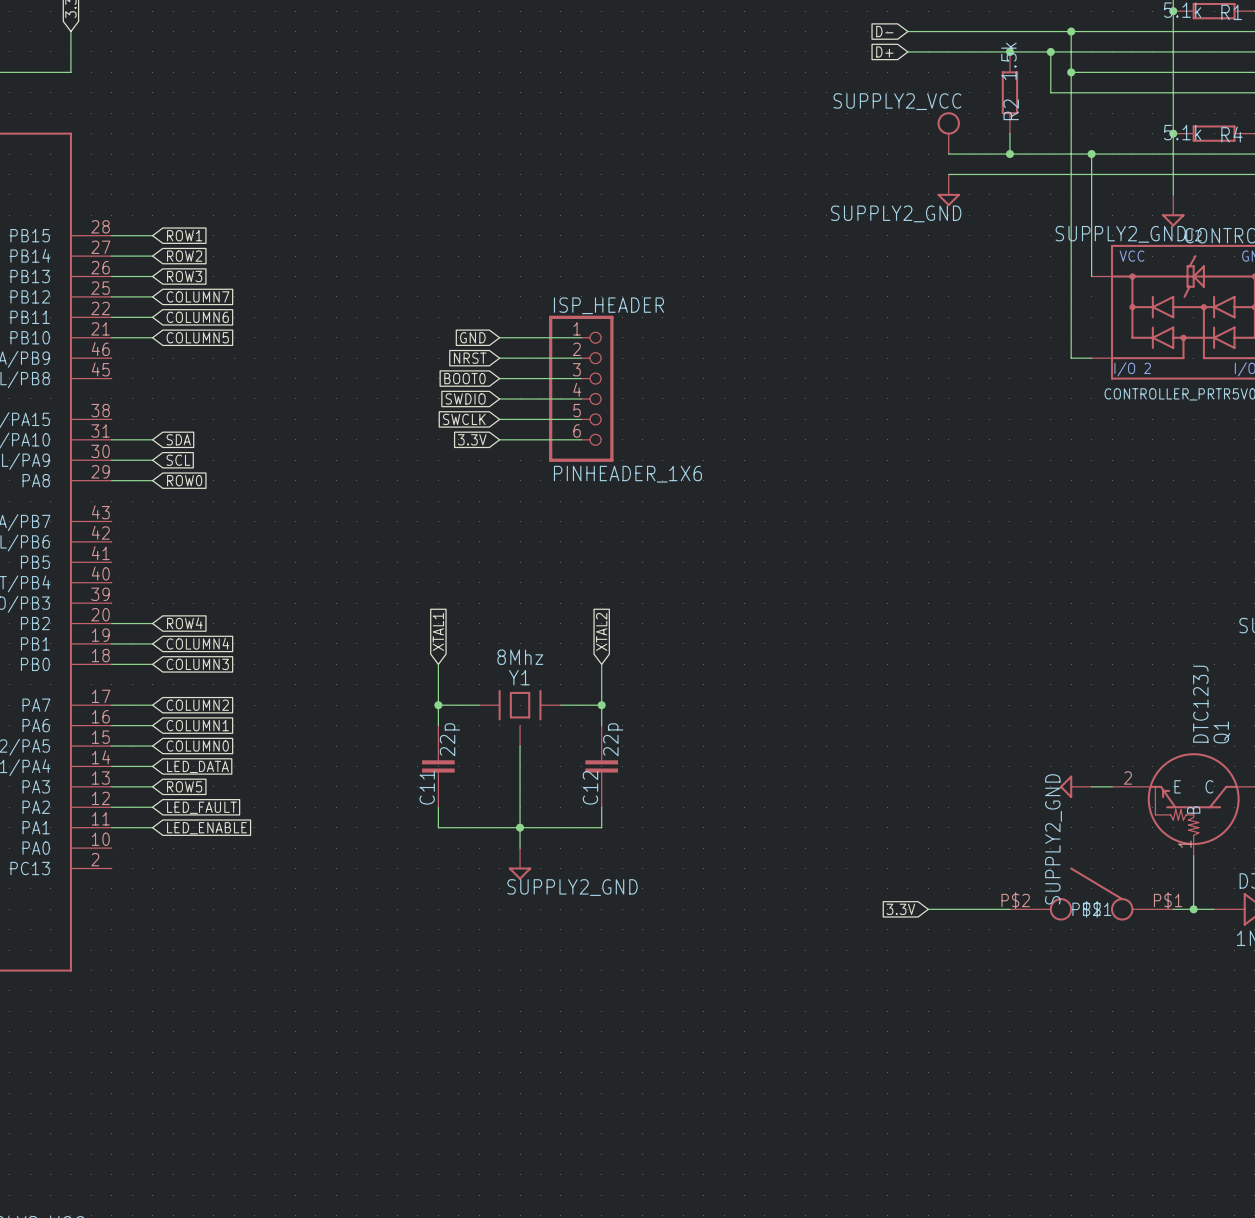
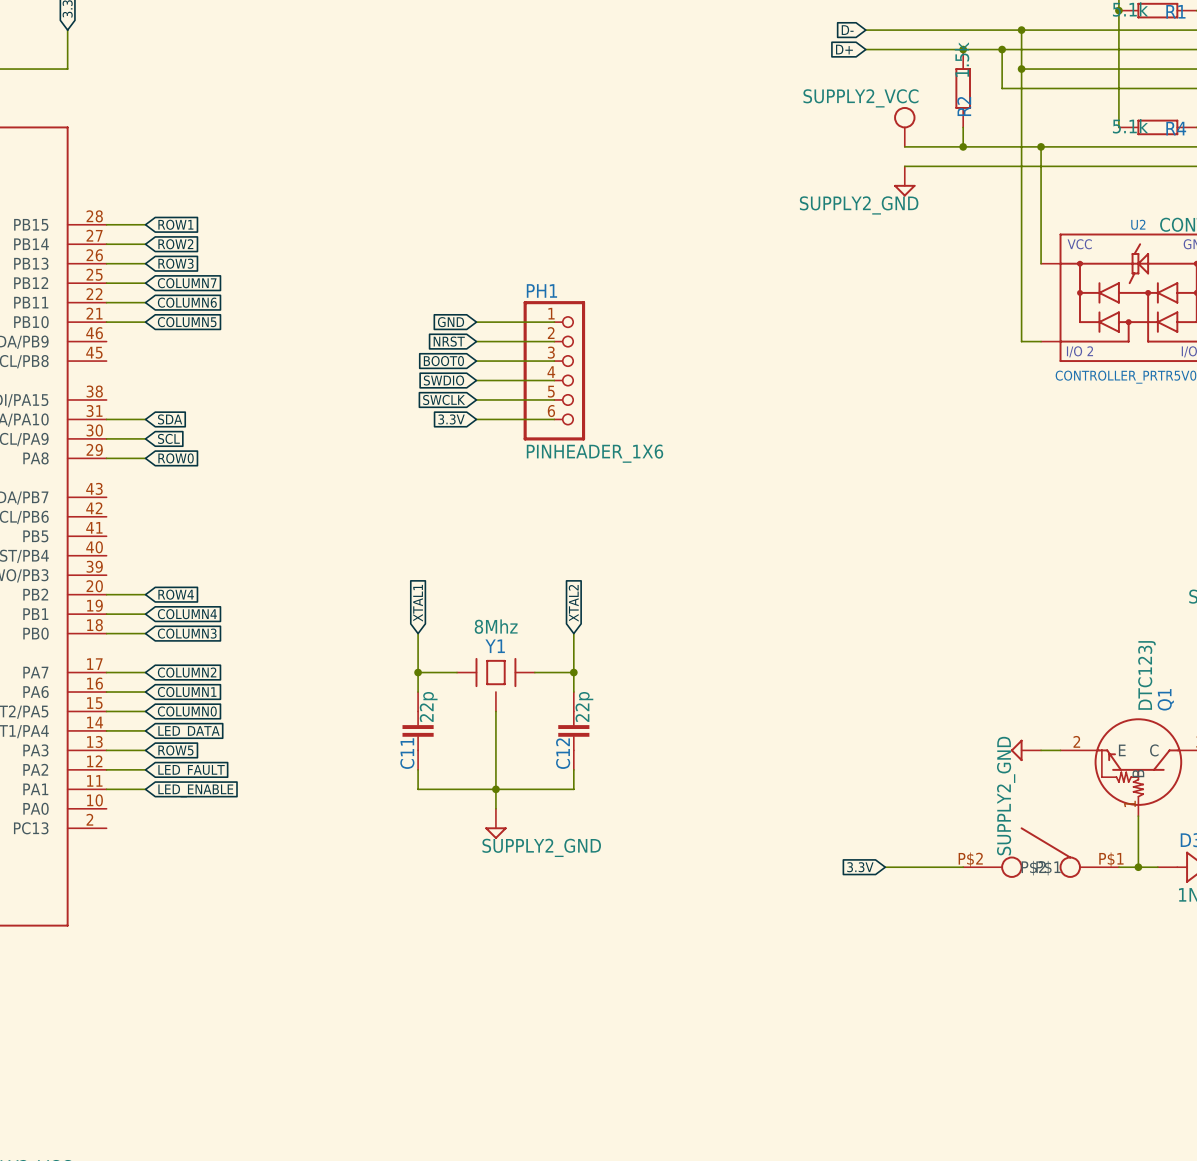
wire: (1173, 133) (1173, 194) -> none
junction: (1173, 133) -> none
power symbol: SUPPLY2_GND (1173, 210) -> none
ISP_HEADER name: ISP_HEADER (608, 305) -> PH1 (541, 290)

